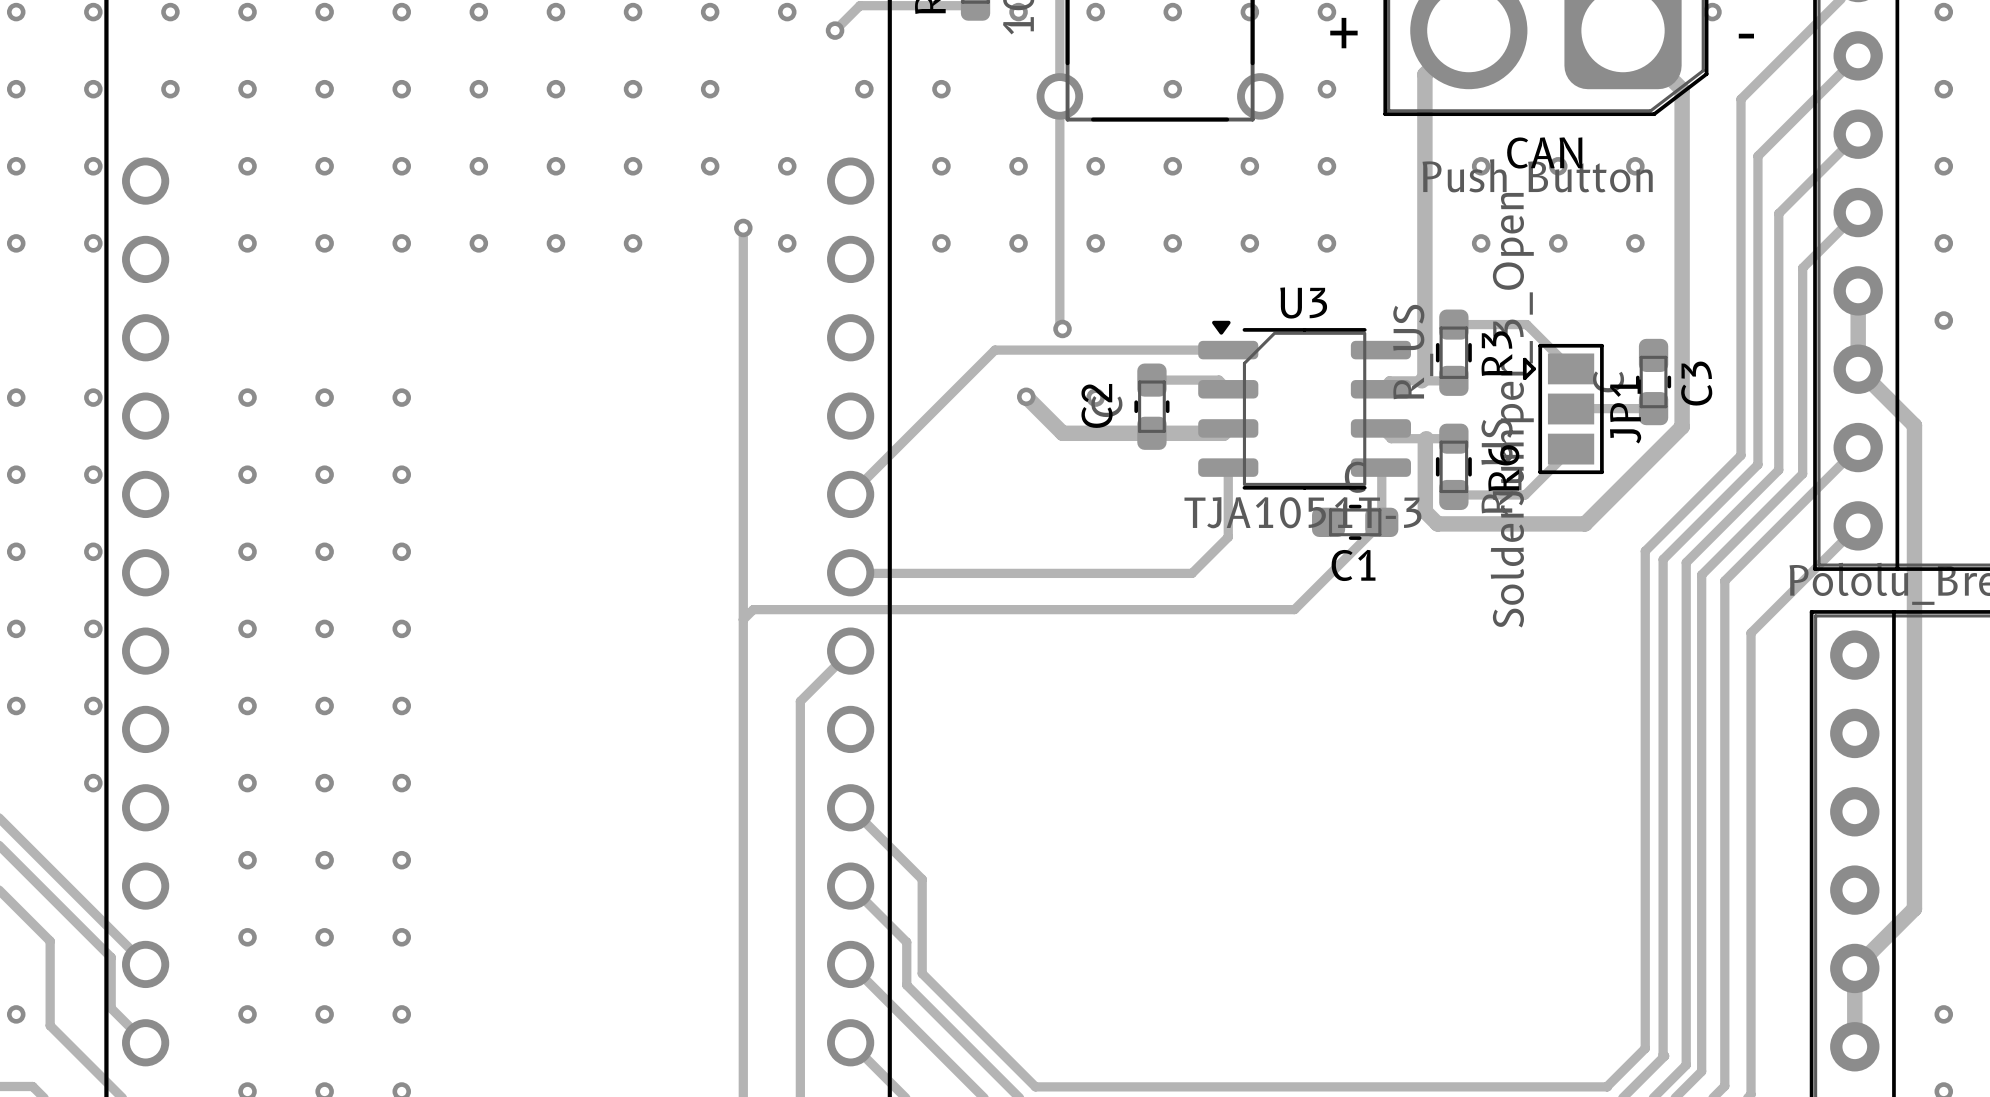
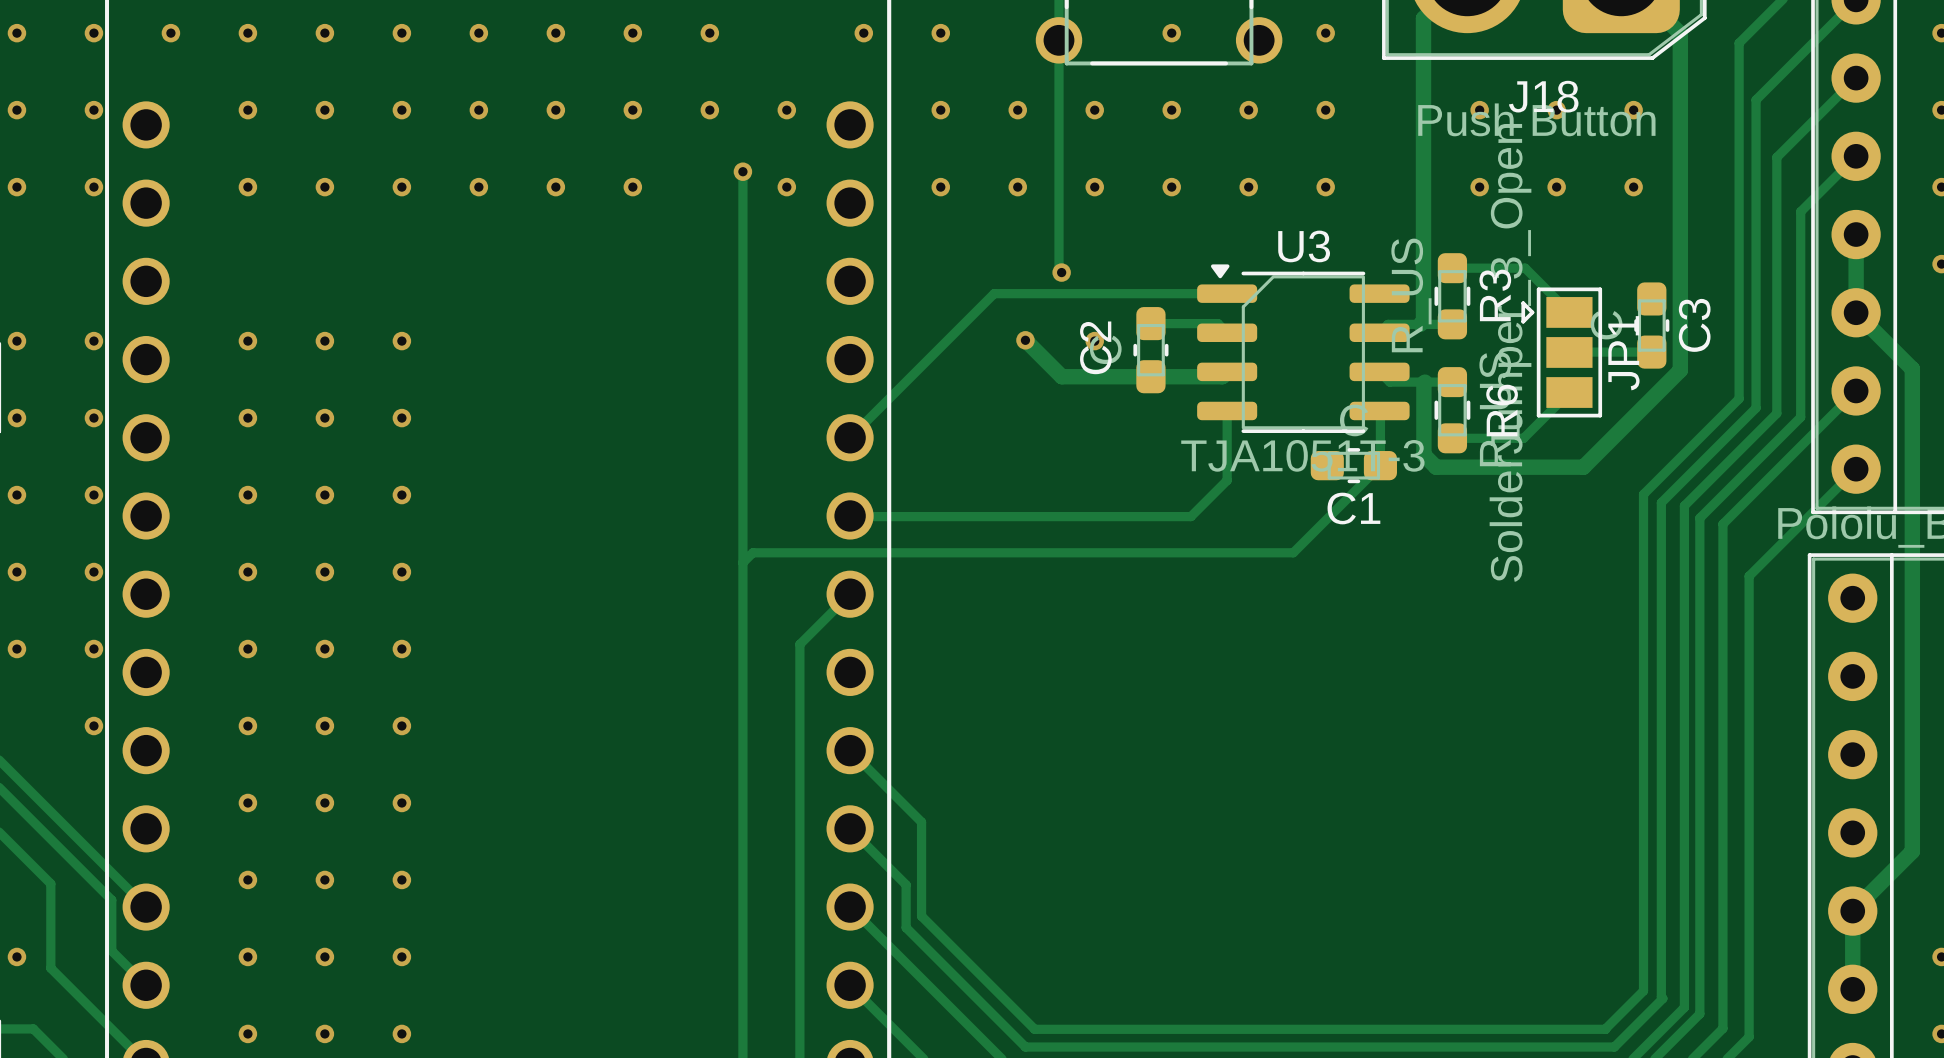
CAN name: CAN (1544, 152) -> J18 (1543, 96)

